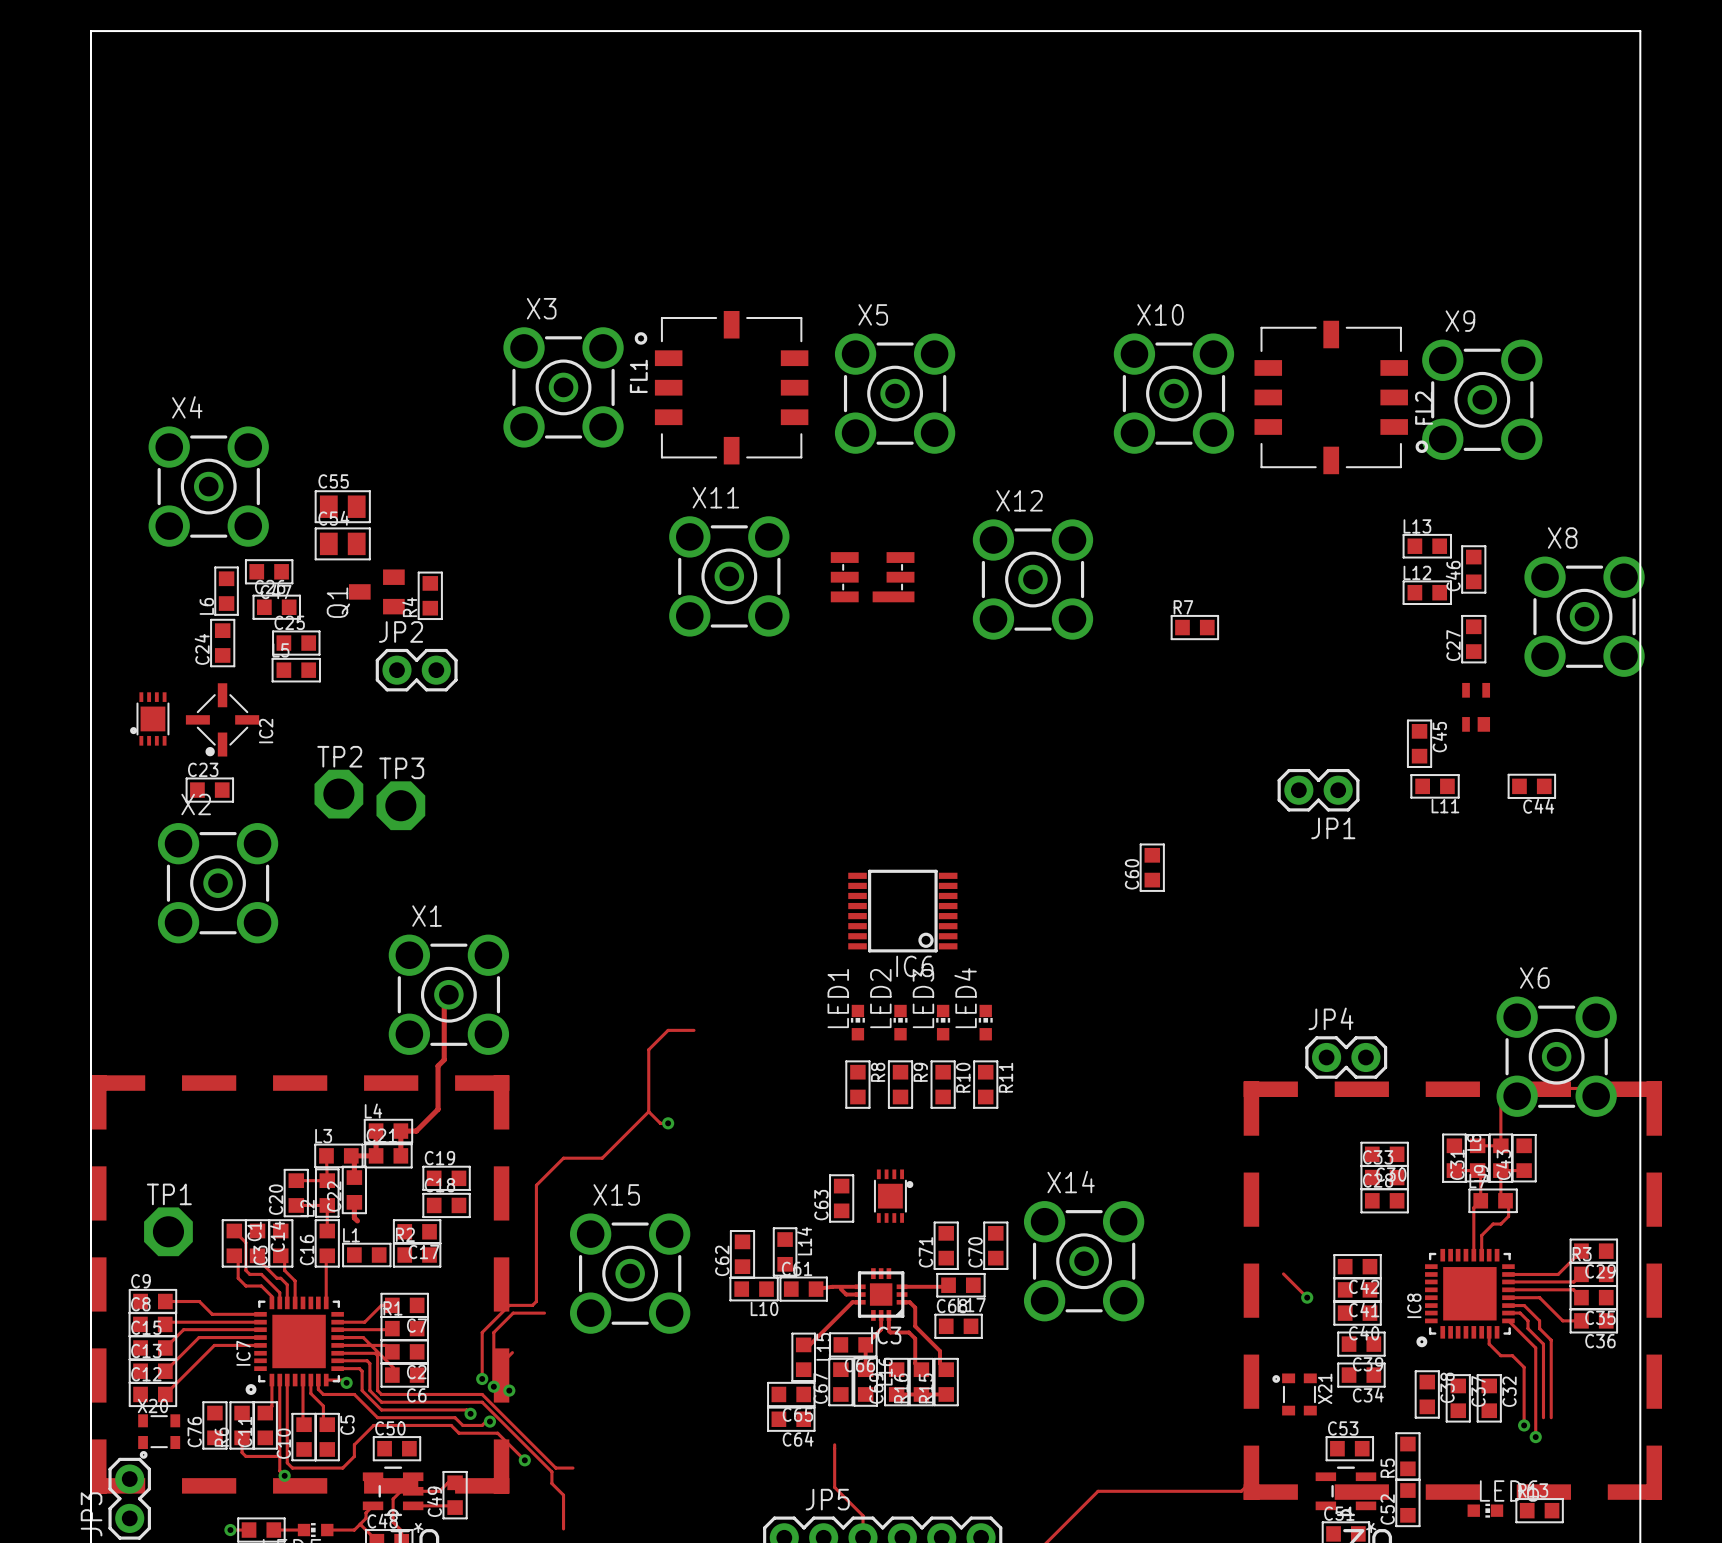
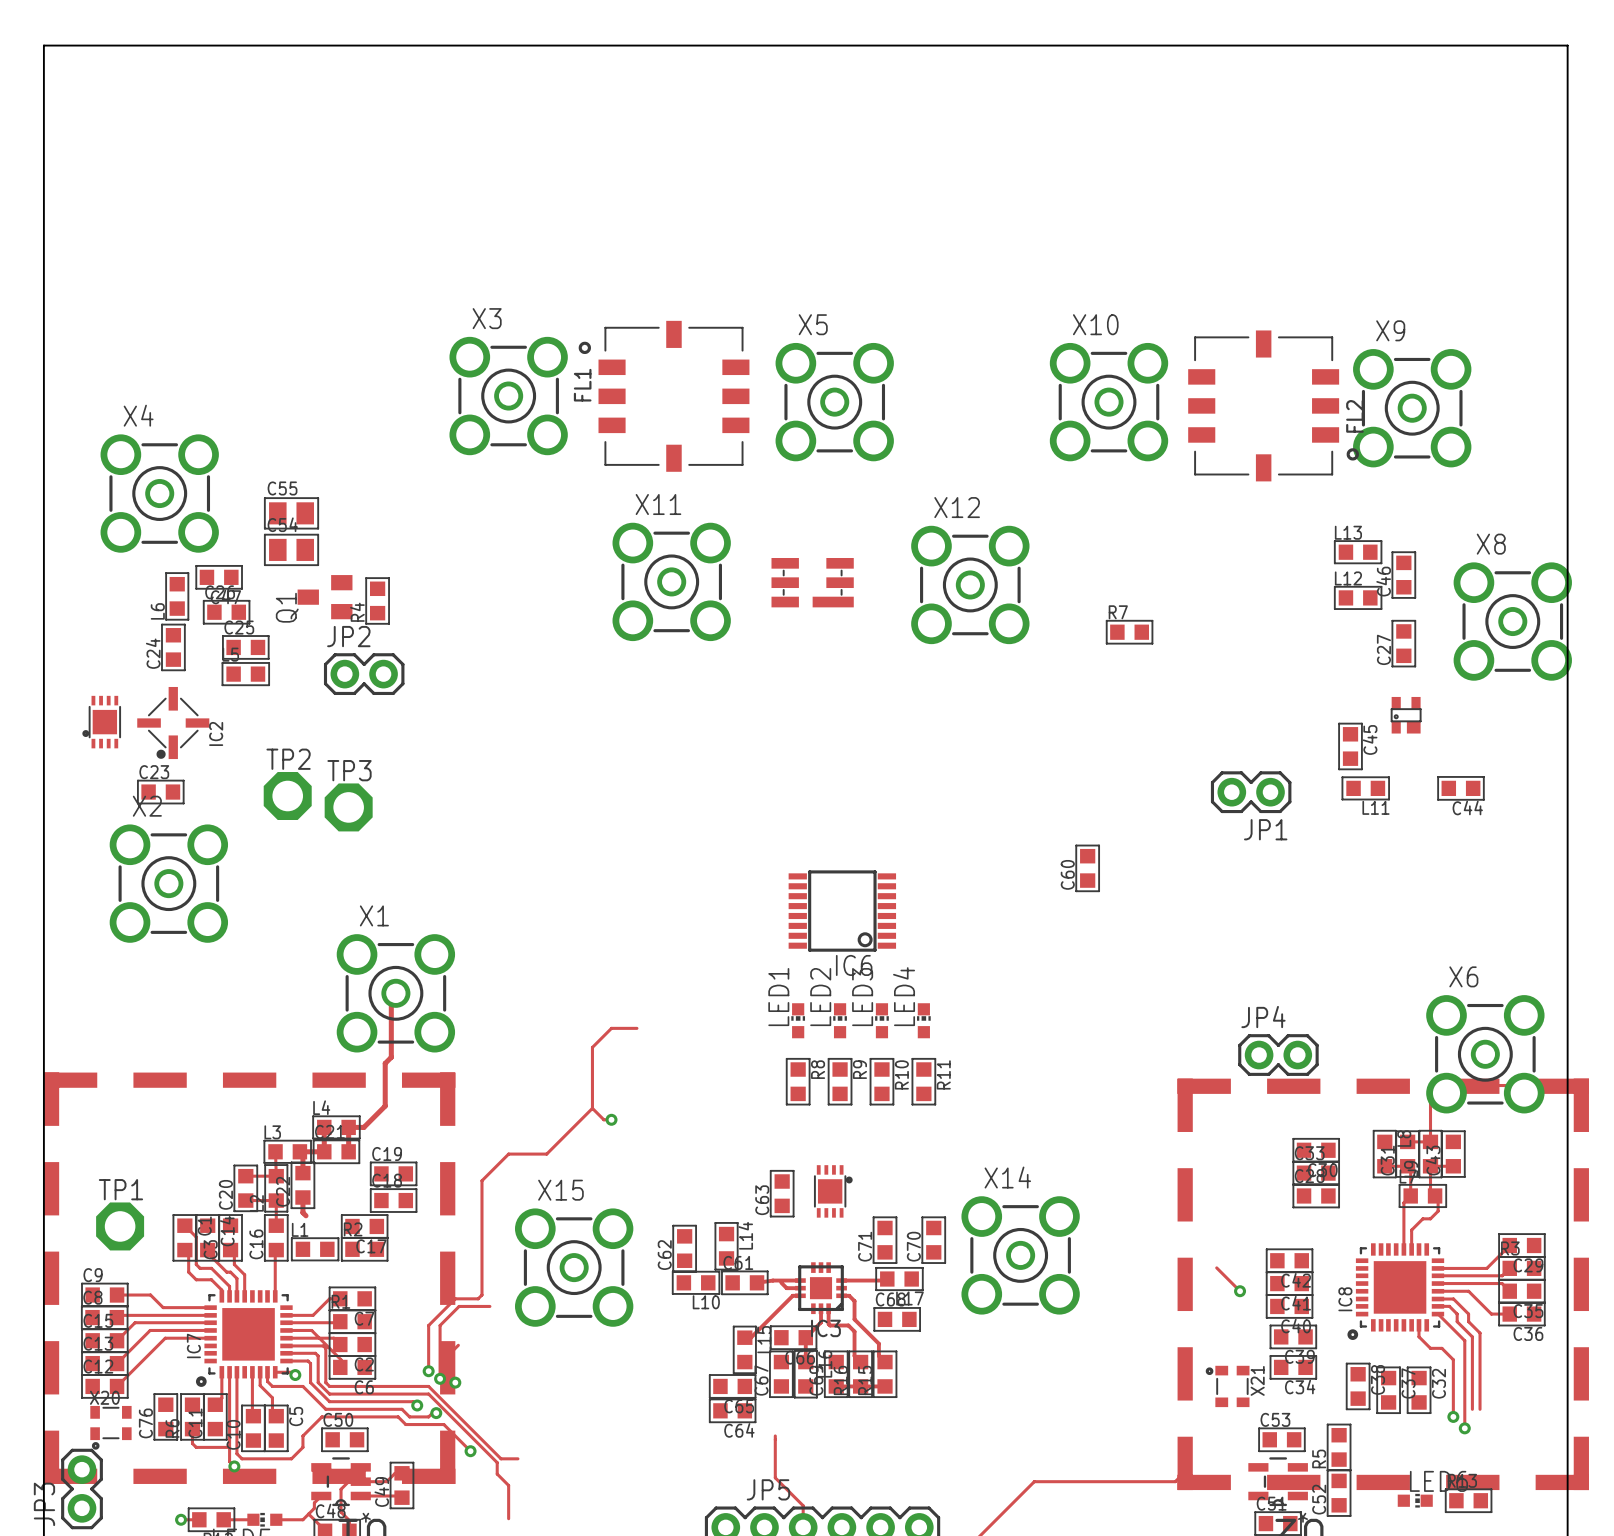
part footprint: [1462, 682, 1491, 732] -> [1390, 696, 1422, 734]

